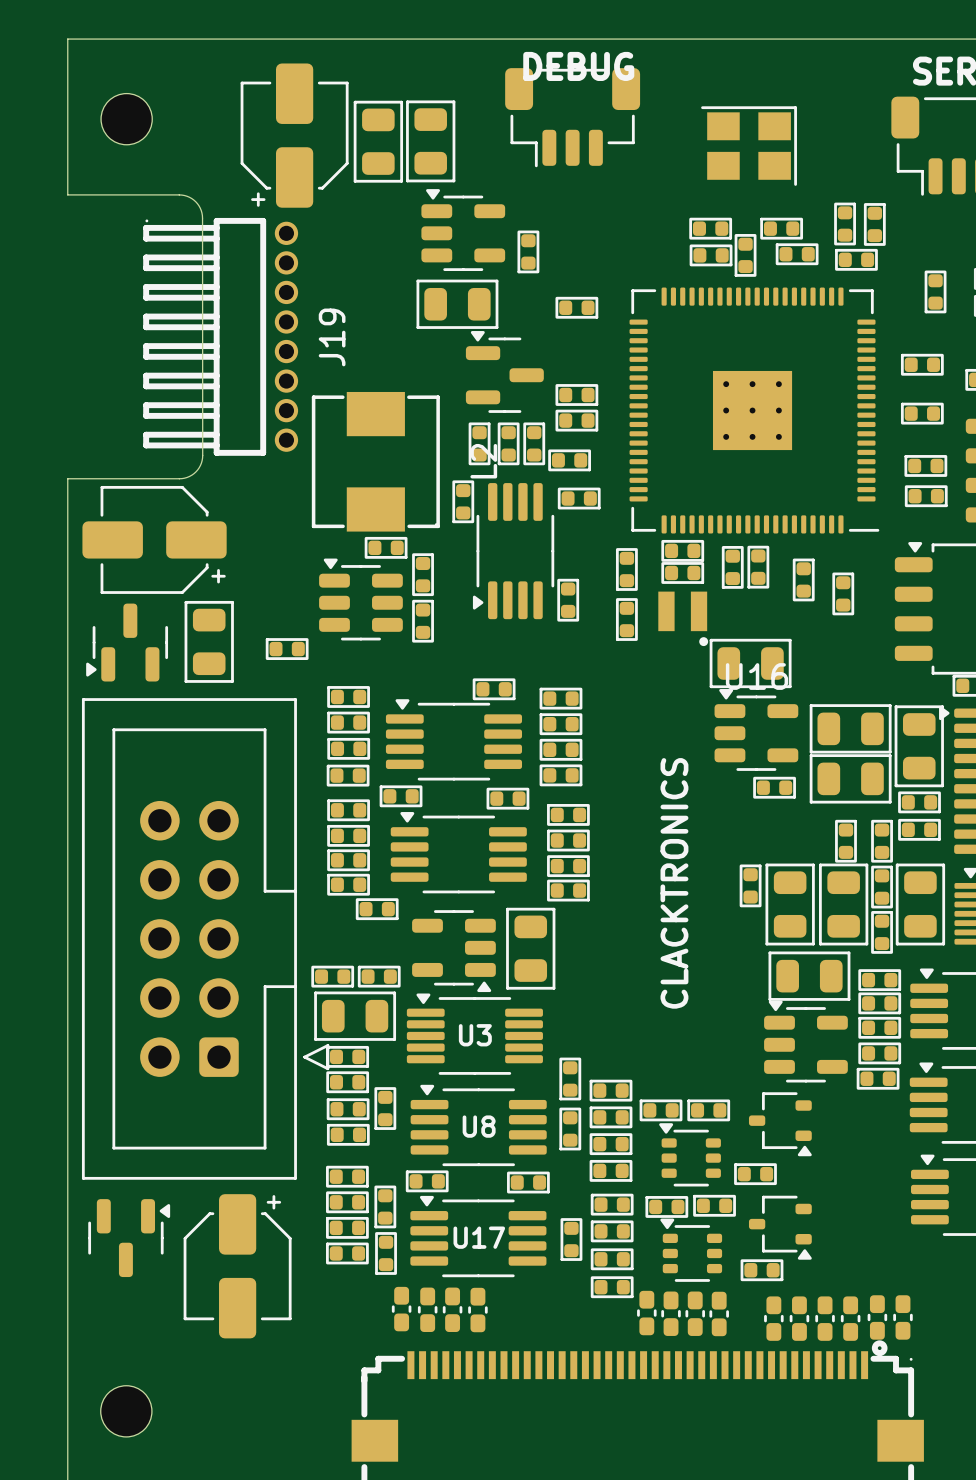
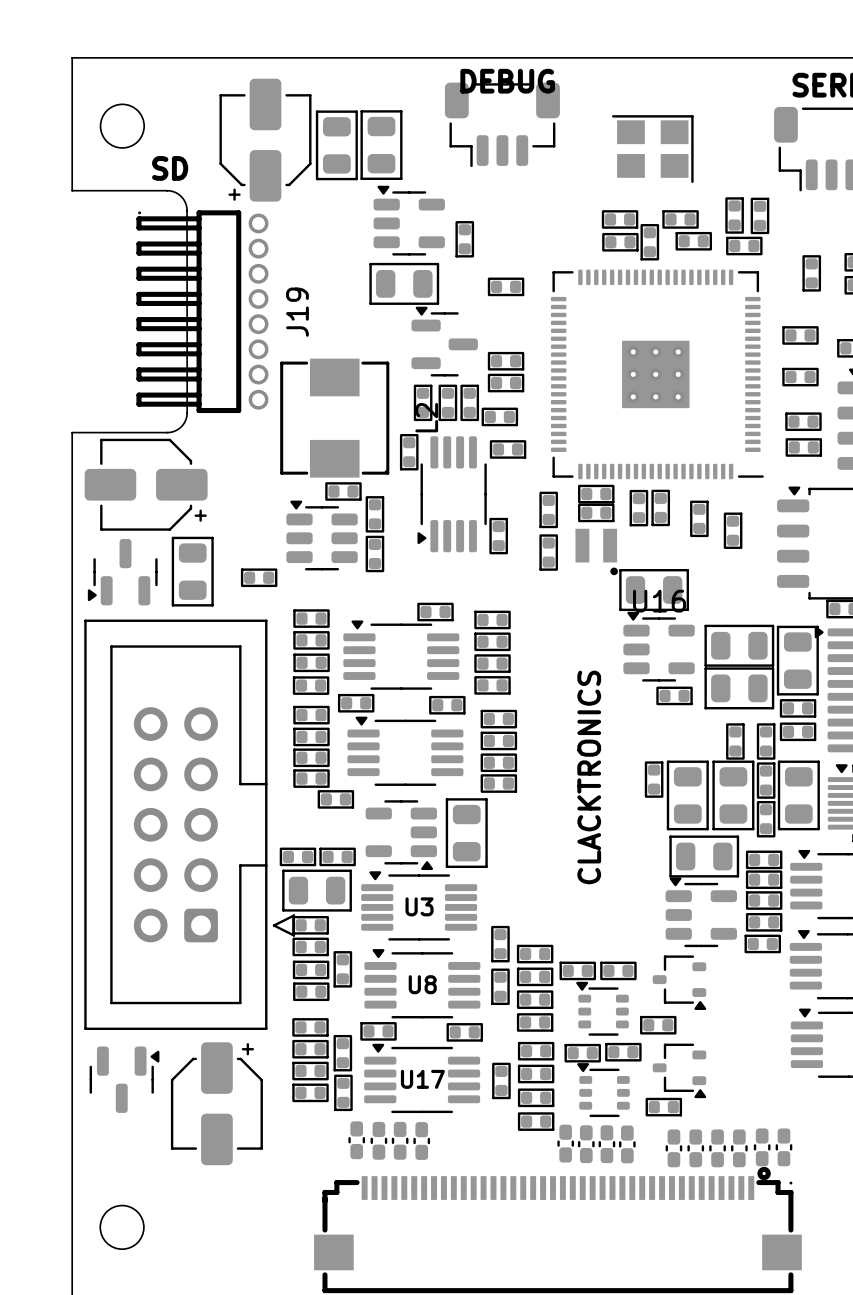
text: none -> SD (170, 168)

